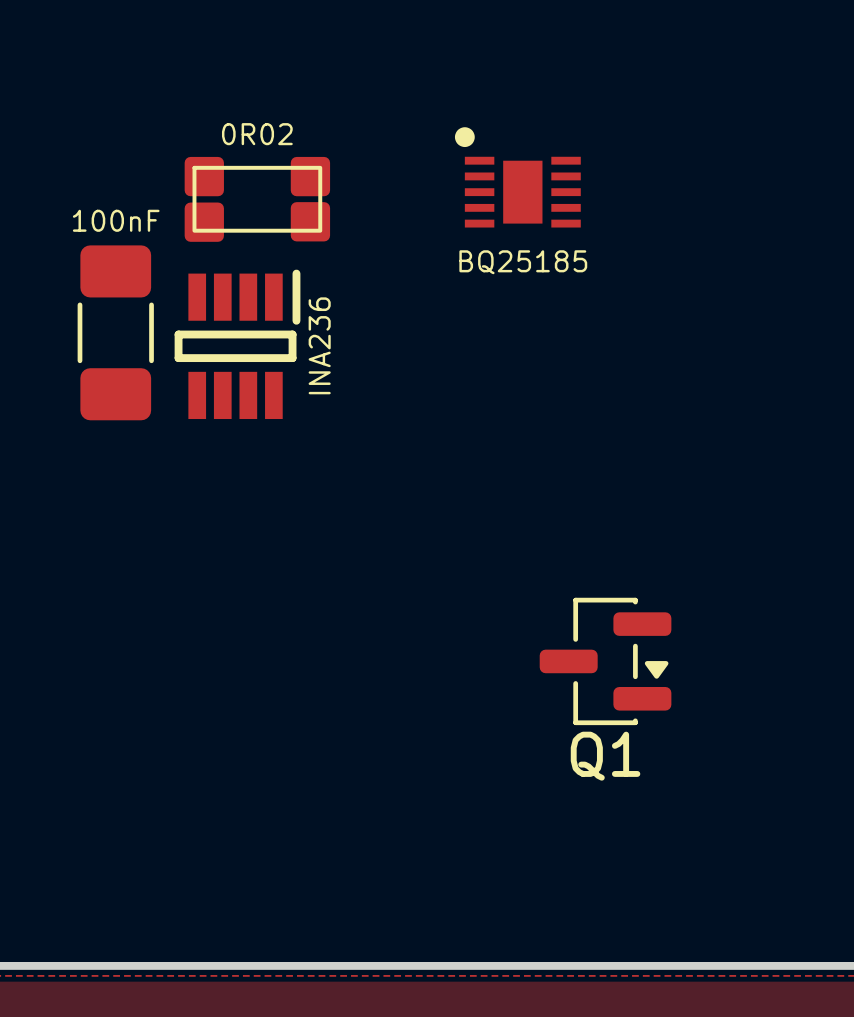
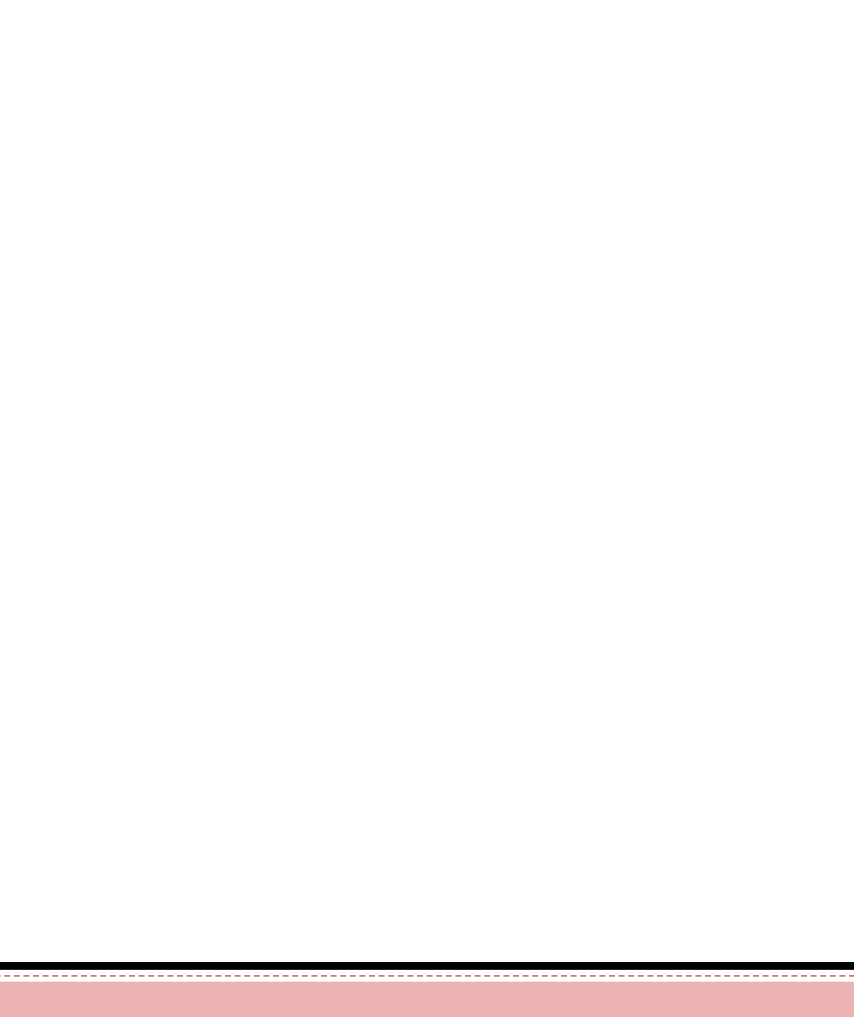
part: BQ25185 (517, 177) -> none
part: 0R02 (257, 199) -> none
part: 100nF (115, 332) -> none
part: INA236 (237, 344) -> none
Q1: (605, 661) -> none

